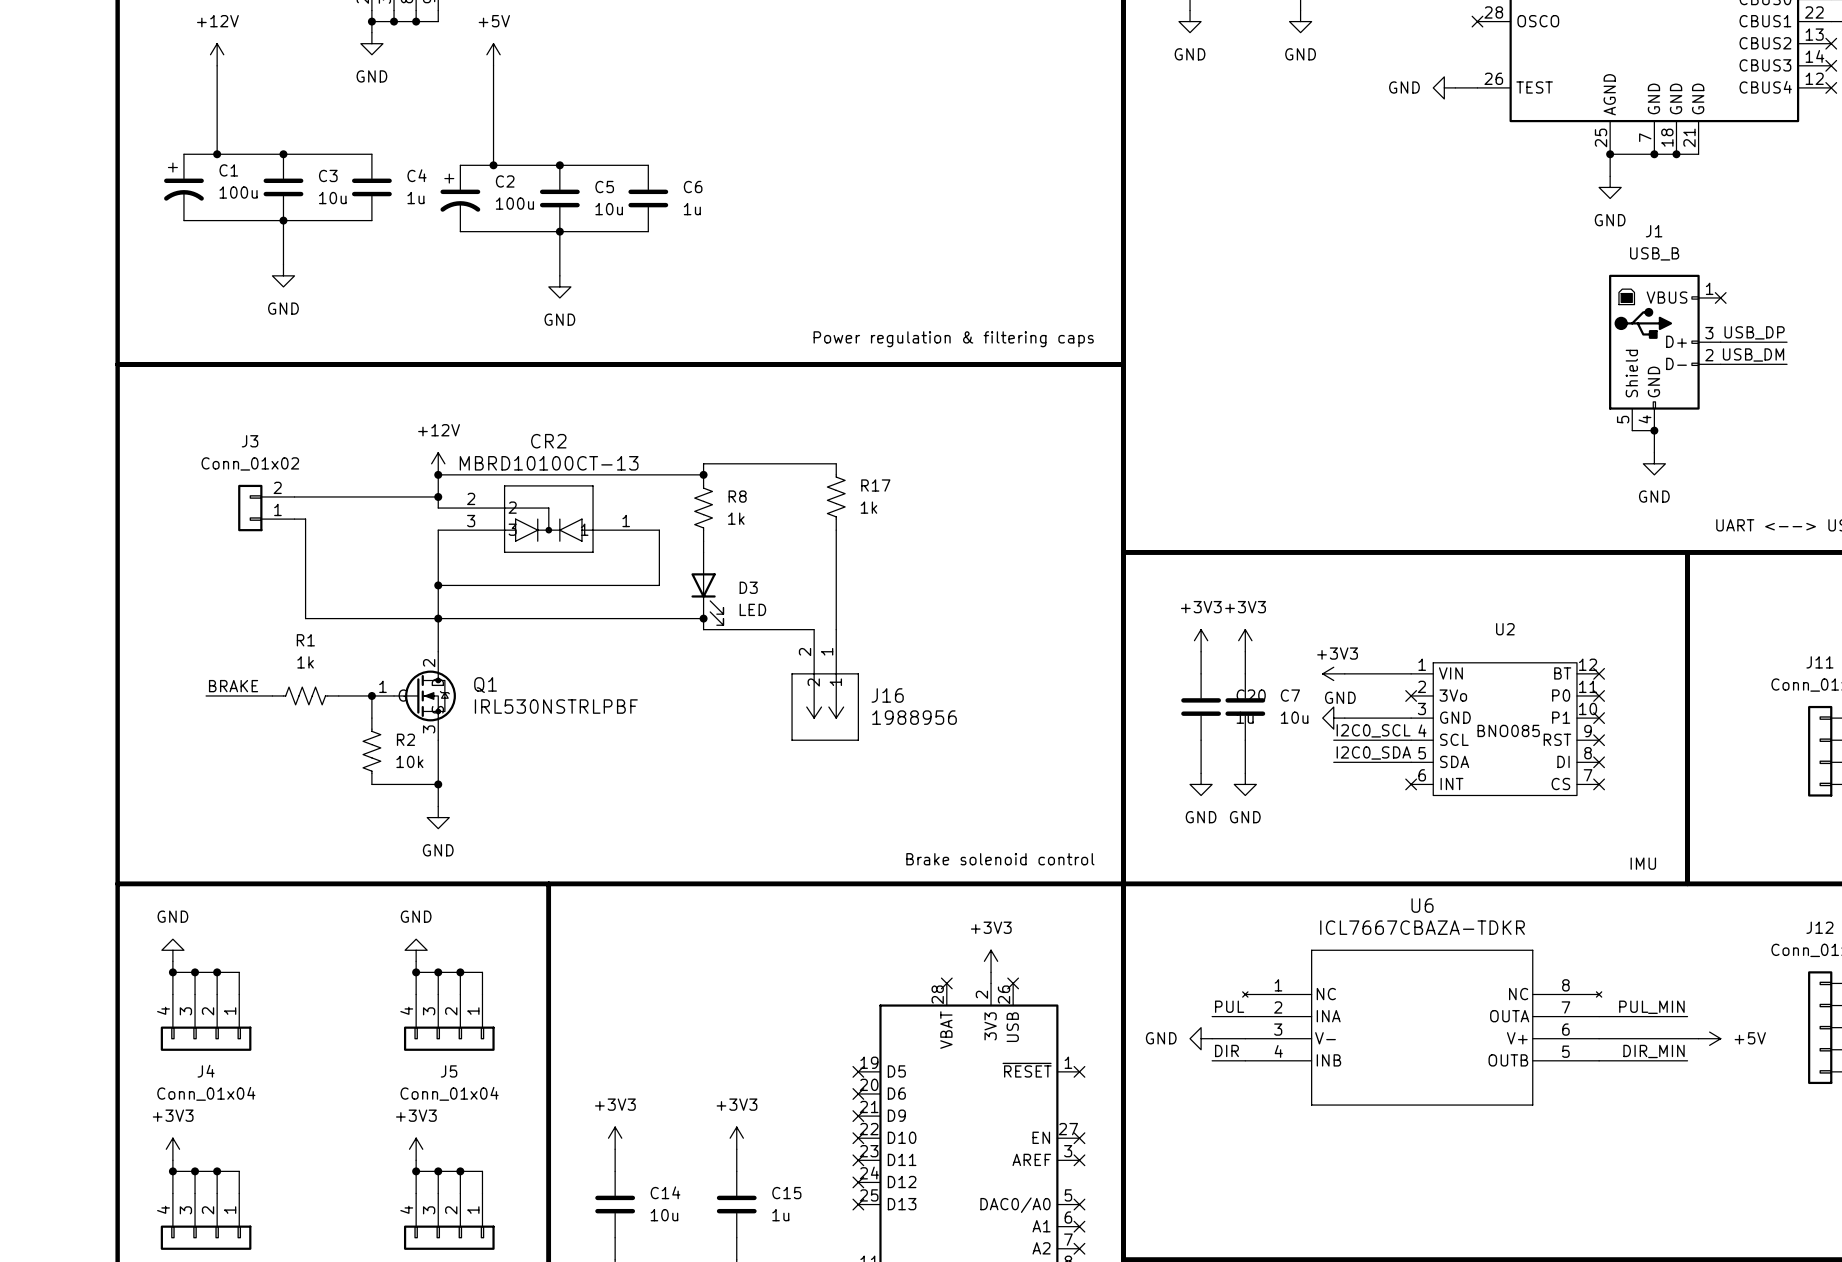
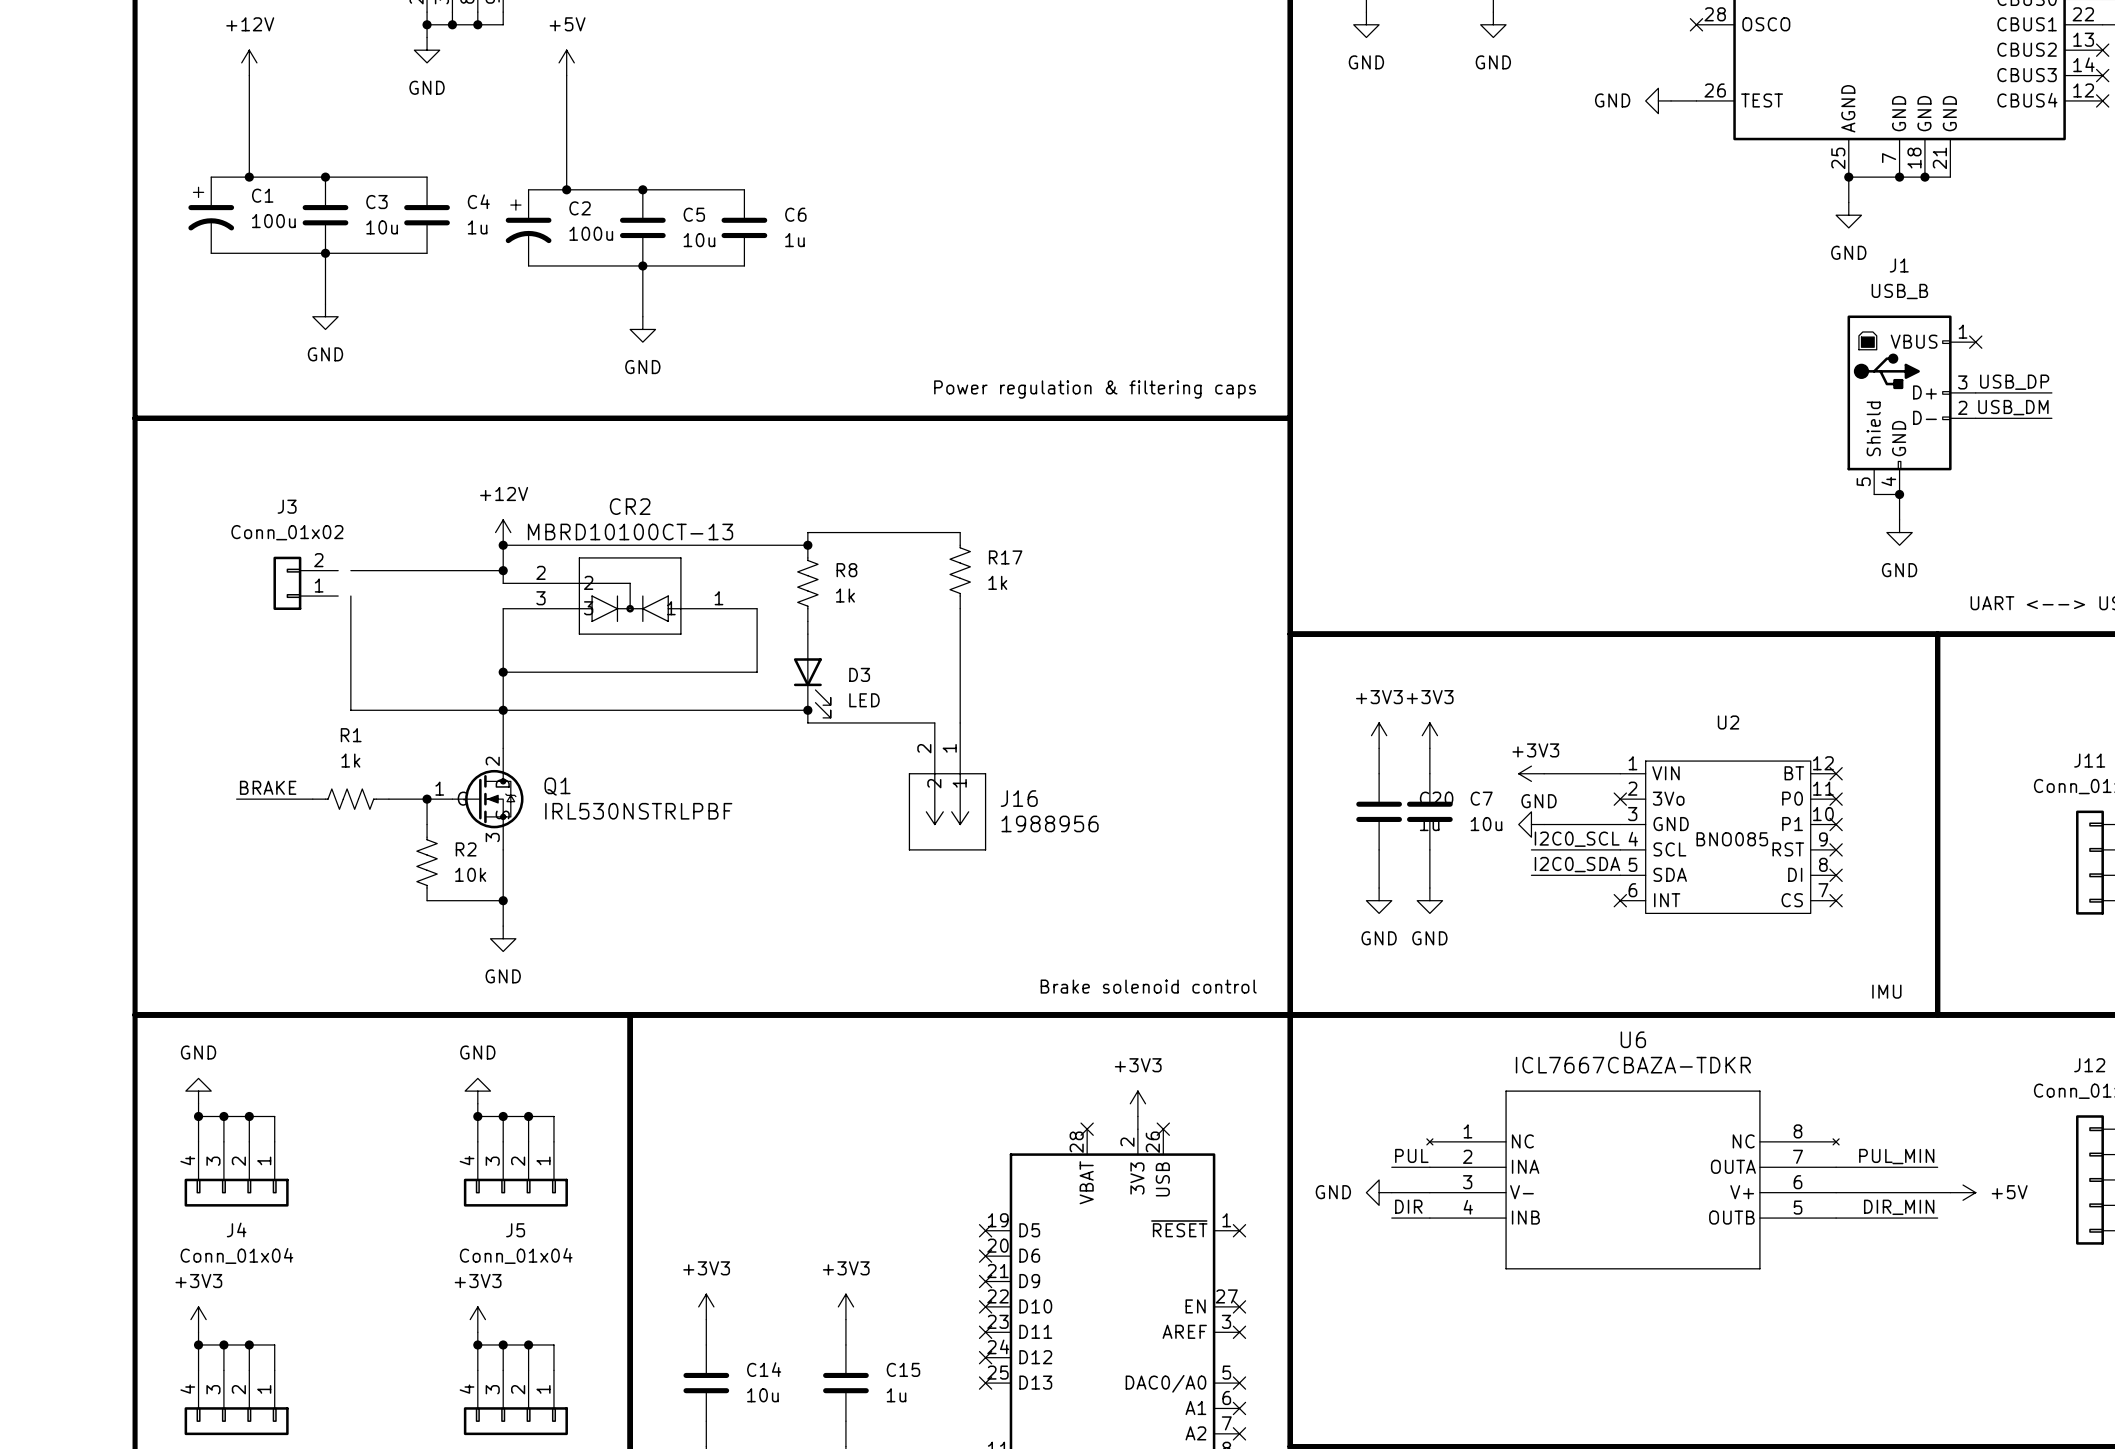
wire: (294, 496) (305, 496) -> none
wire: (294, 519) (305, 519) -> none

